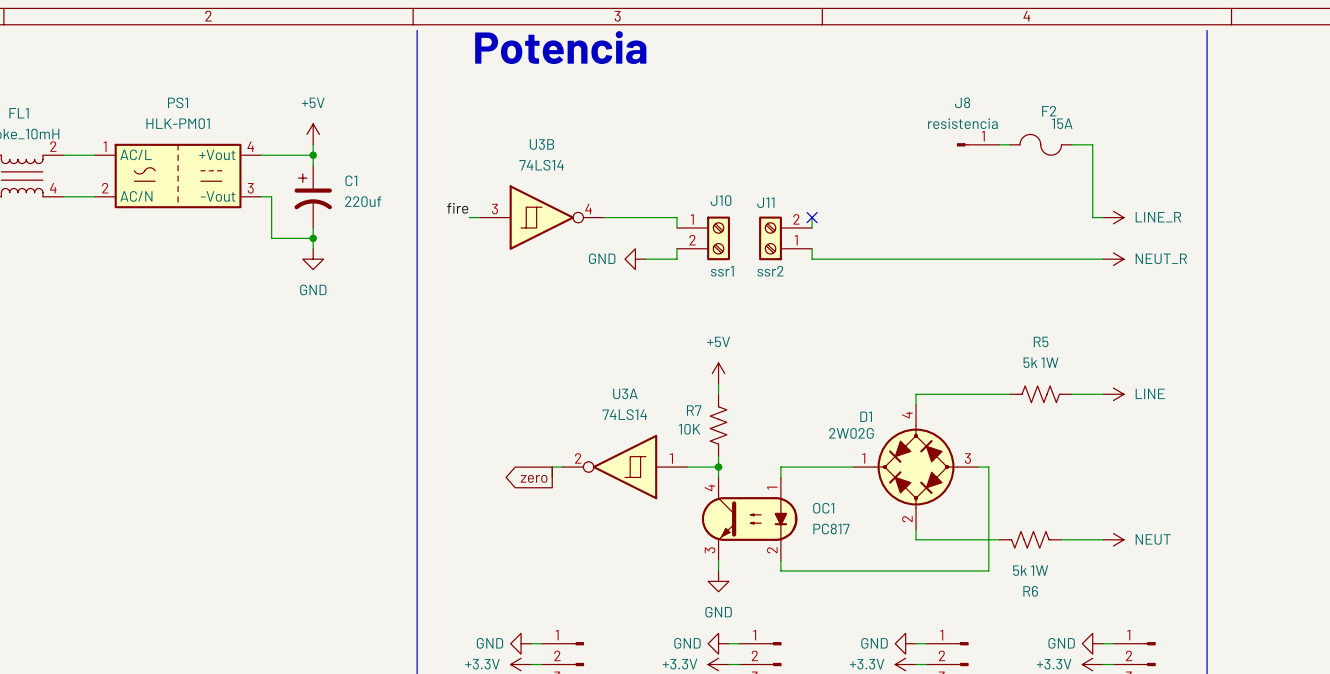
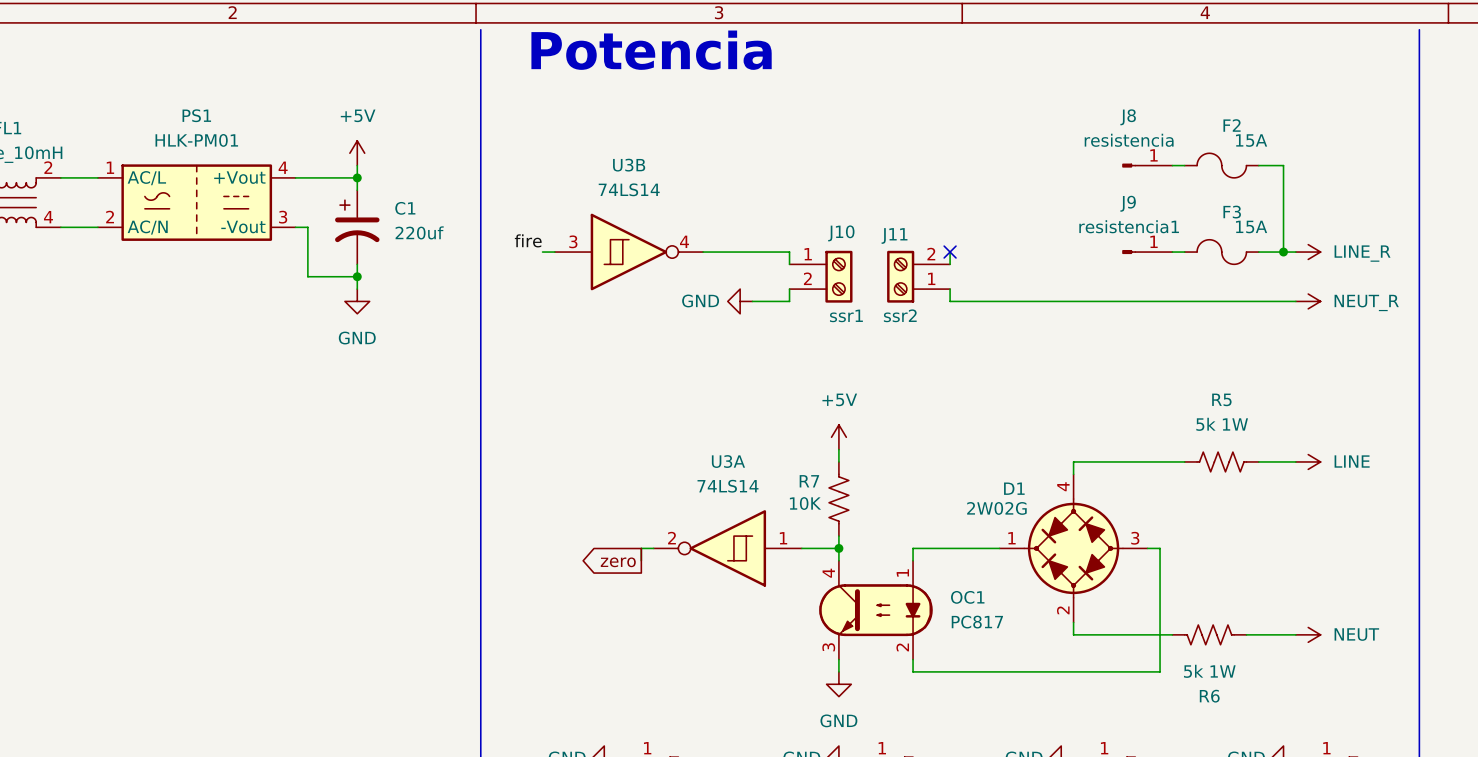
J9: none -> resistencia1 (1147, 252)
wire: none -> (1172, 252) (1184, 252)
F3: none -> 15A (1221, 252)
wire: none -> (1258, 252) (1283, 252)
junction: none -> (1283, 252)

